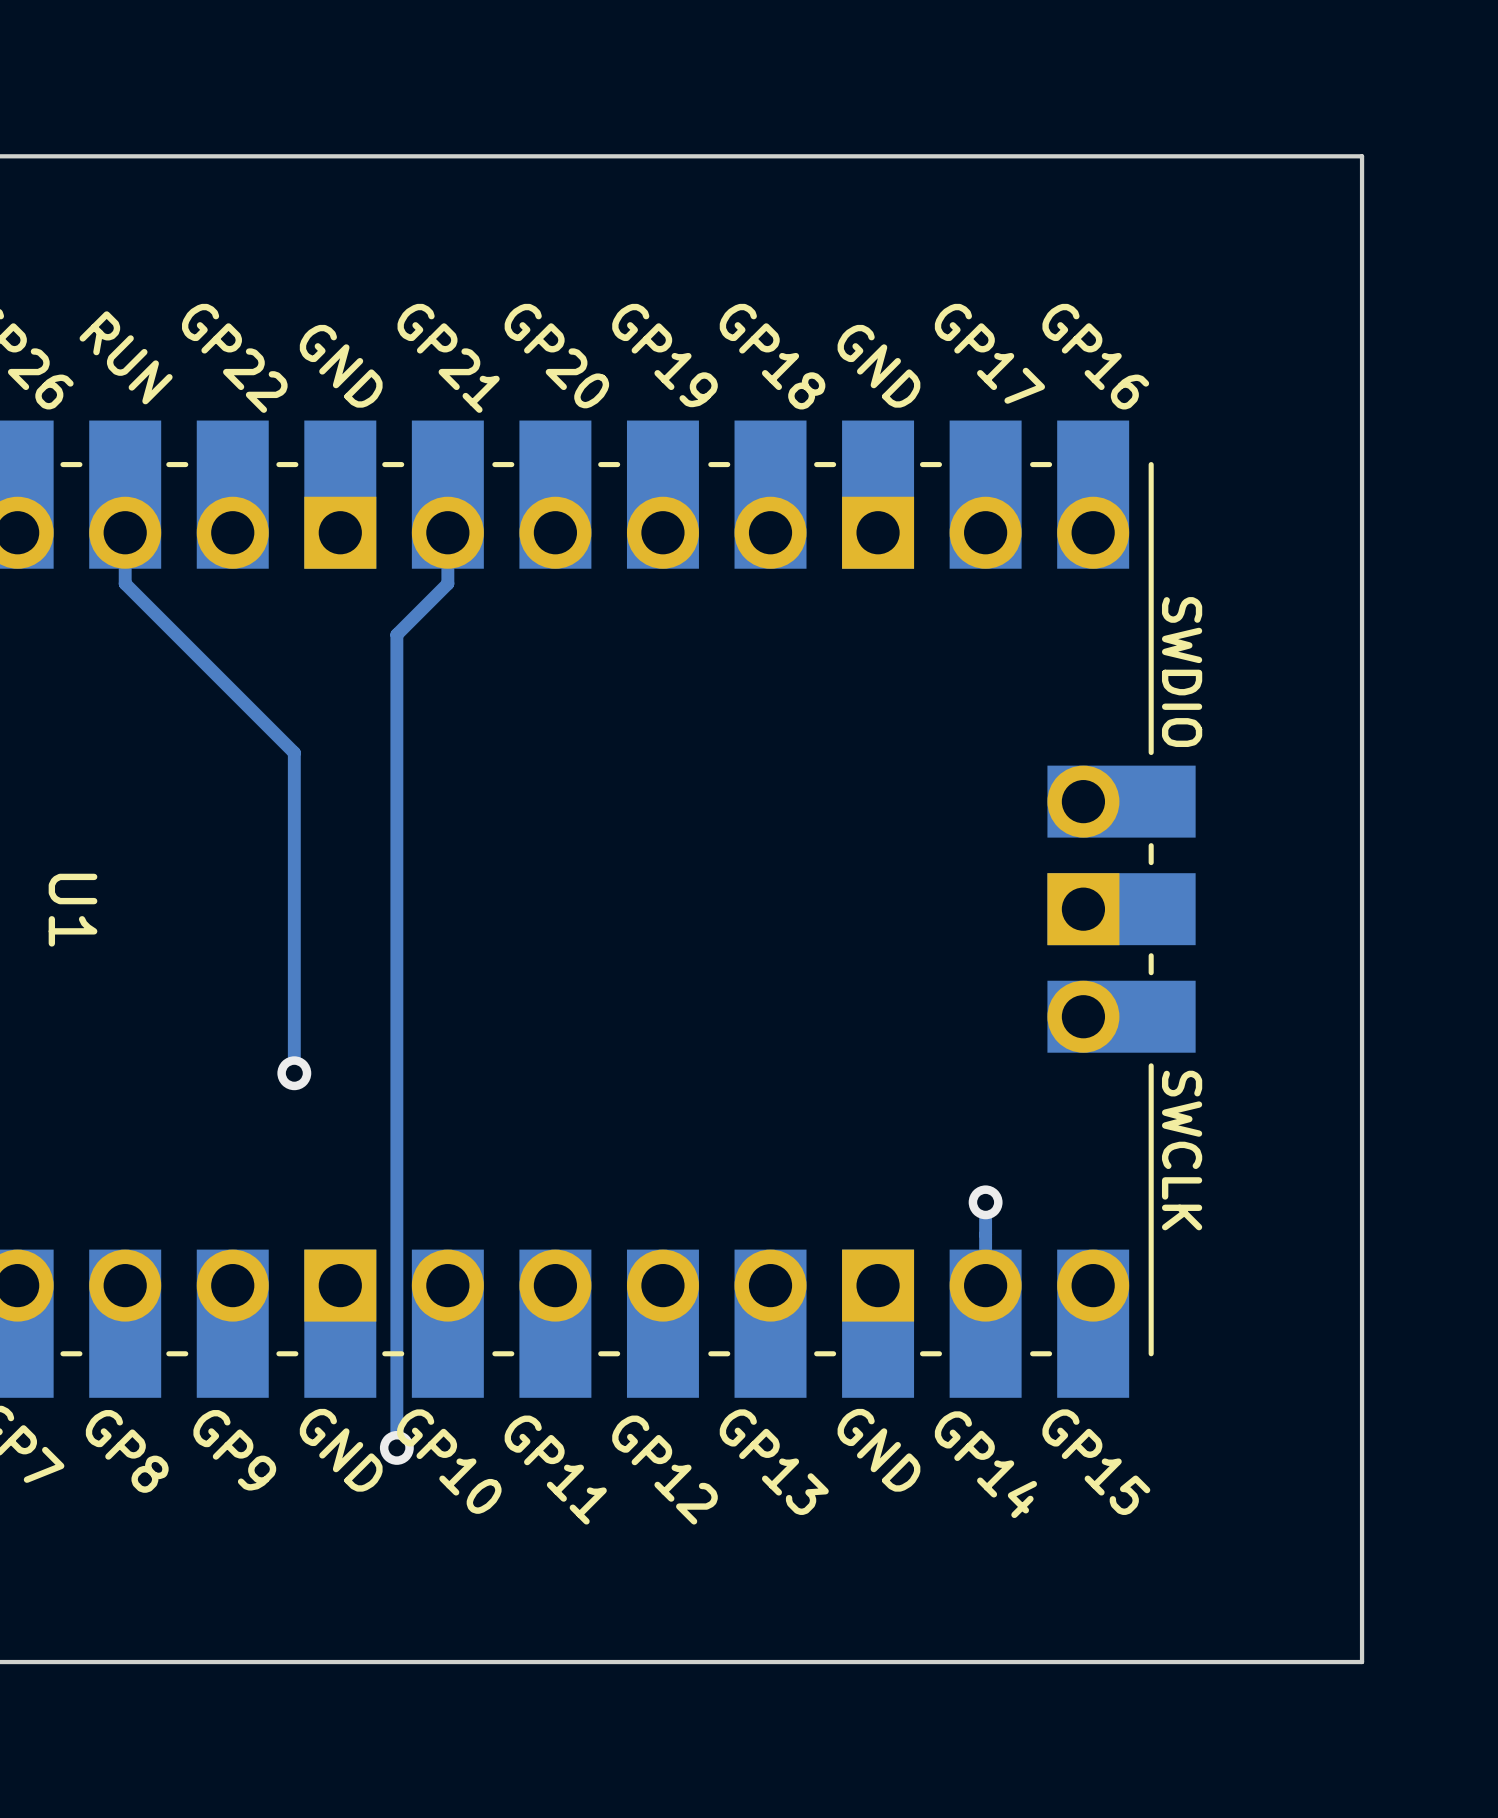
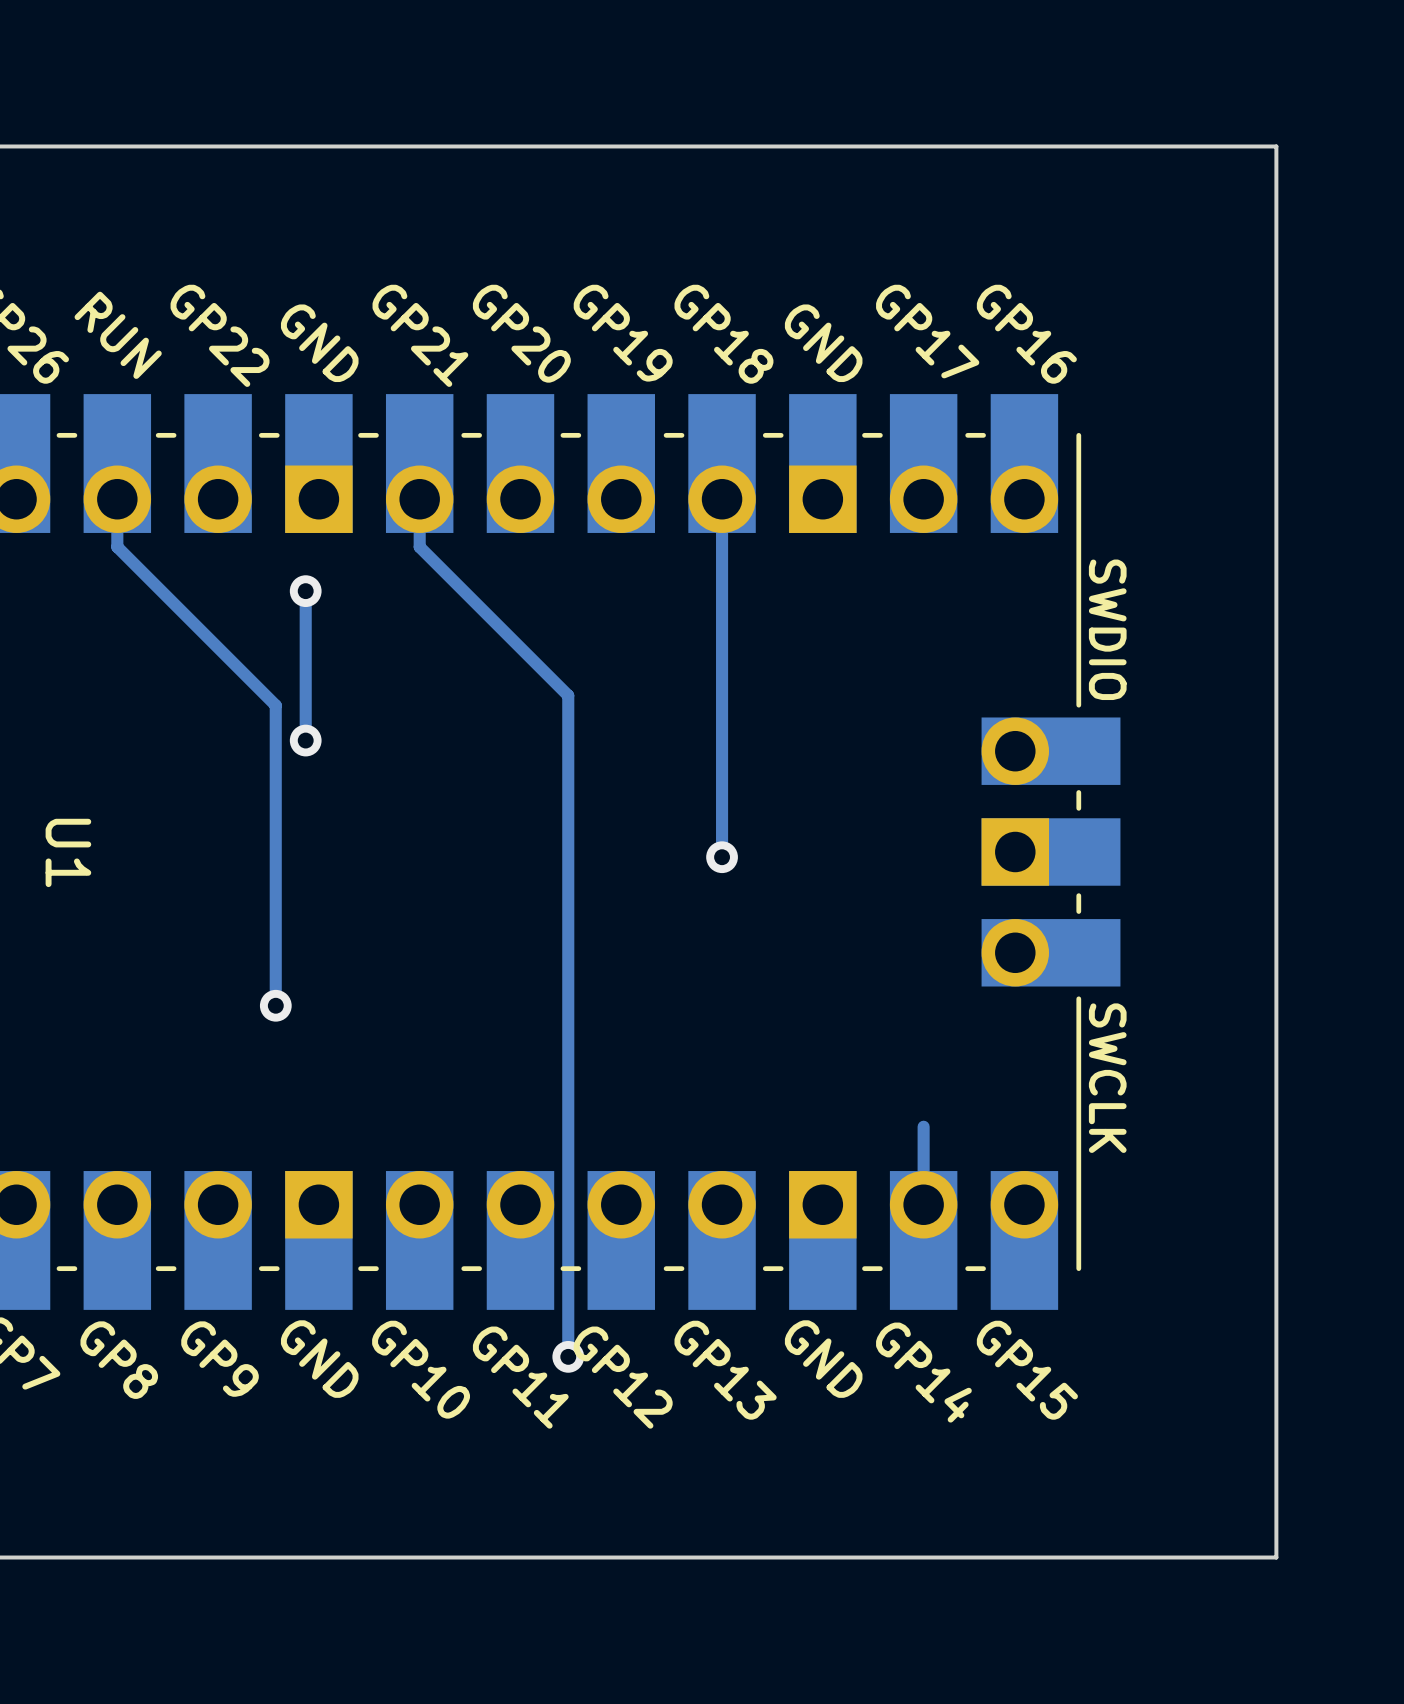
track: none -> (722, 499) (722, 857)
track: (447, 583) (396, 634) (396, 1447) -> (419, 547) (568, 695) (568, 1356)
track: none -> (305, 591) (305, 740)
via: none -> (305, 591)
via: none -> (305, 740)
via: none -> (722, 857)
via: (985, 1202) -> none
via position: (396, 1447) -> (568, 1356)

